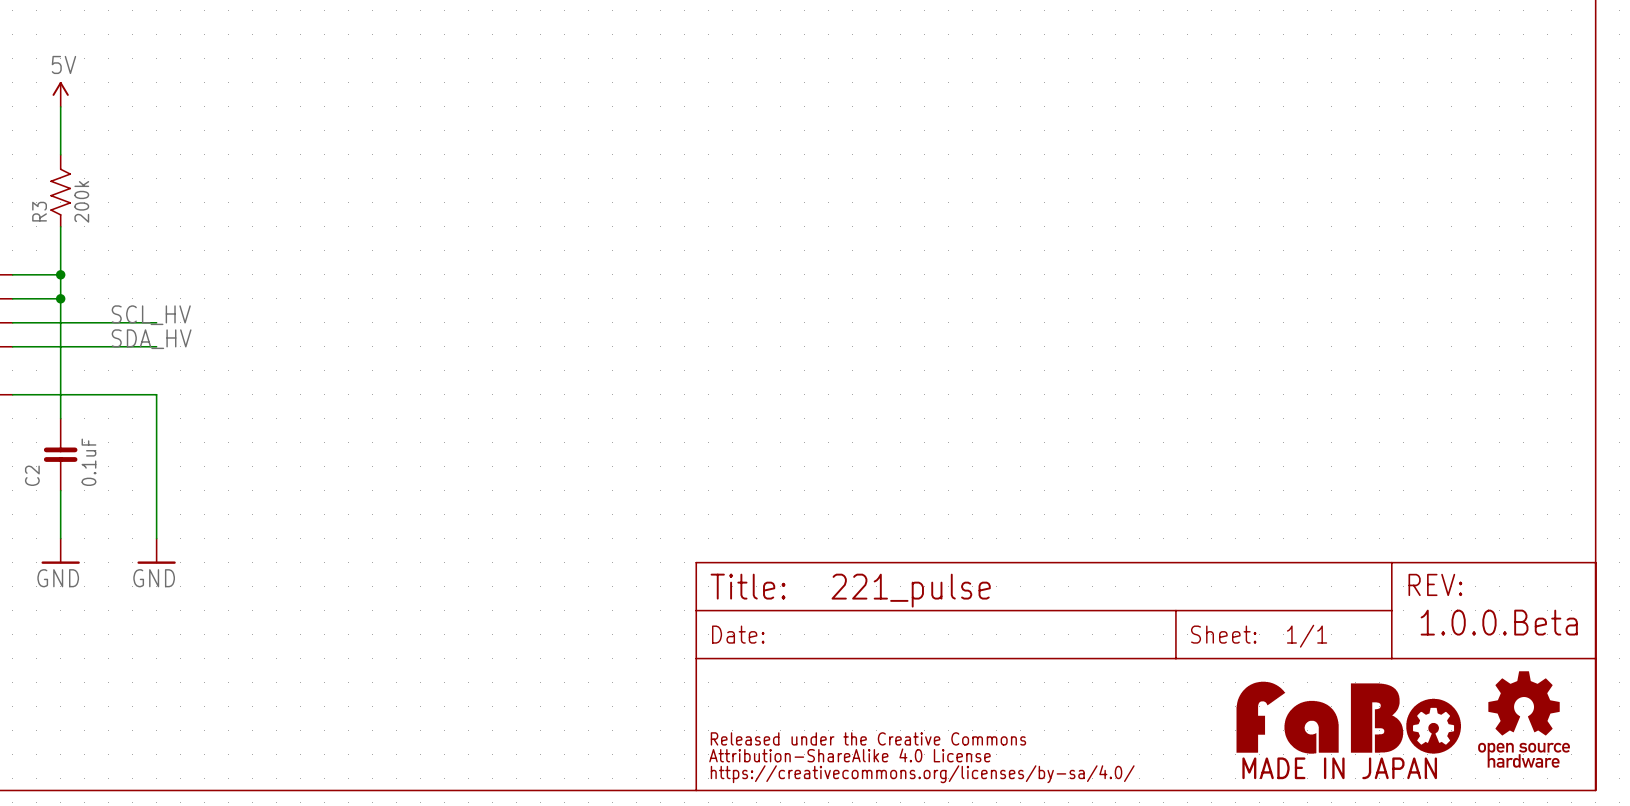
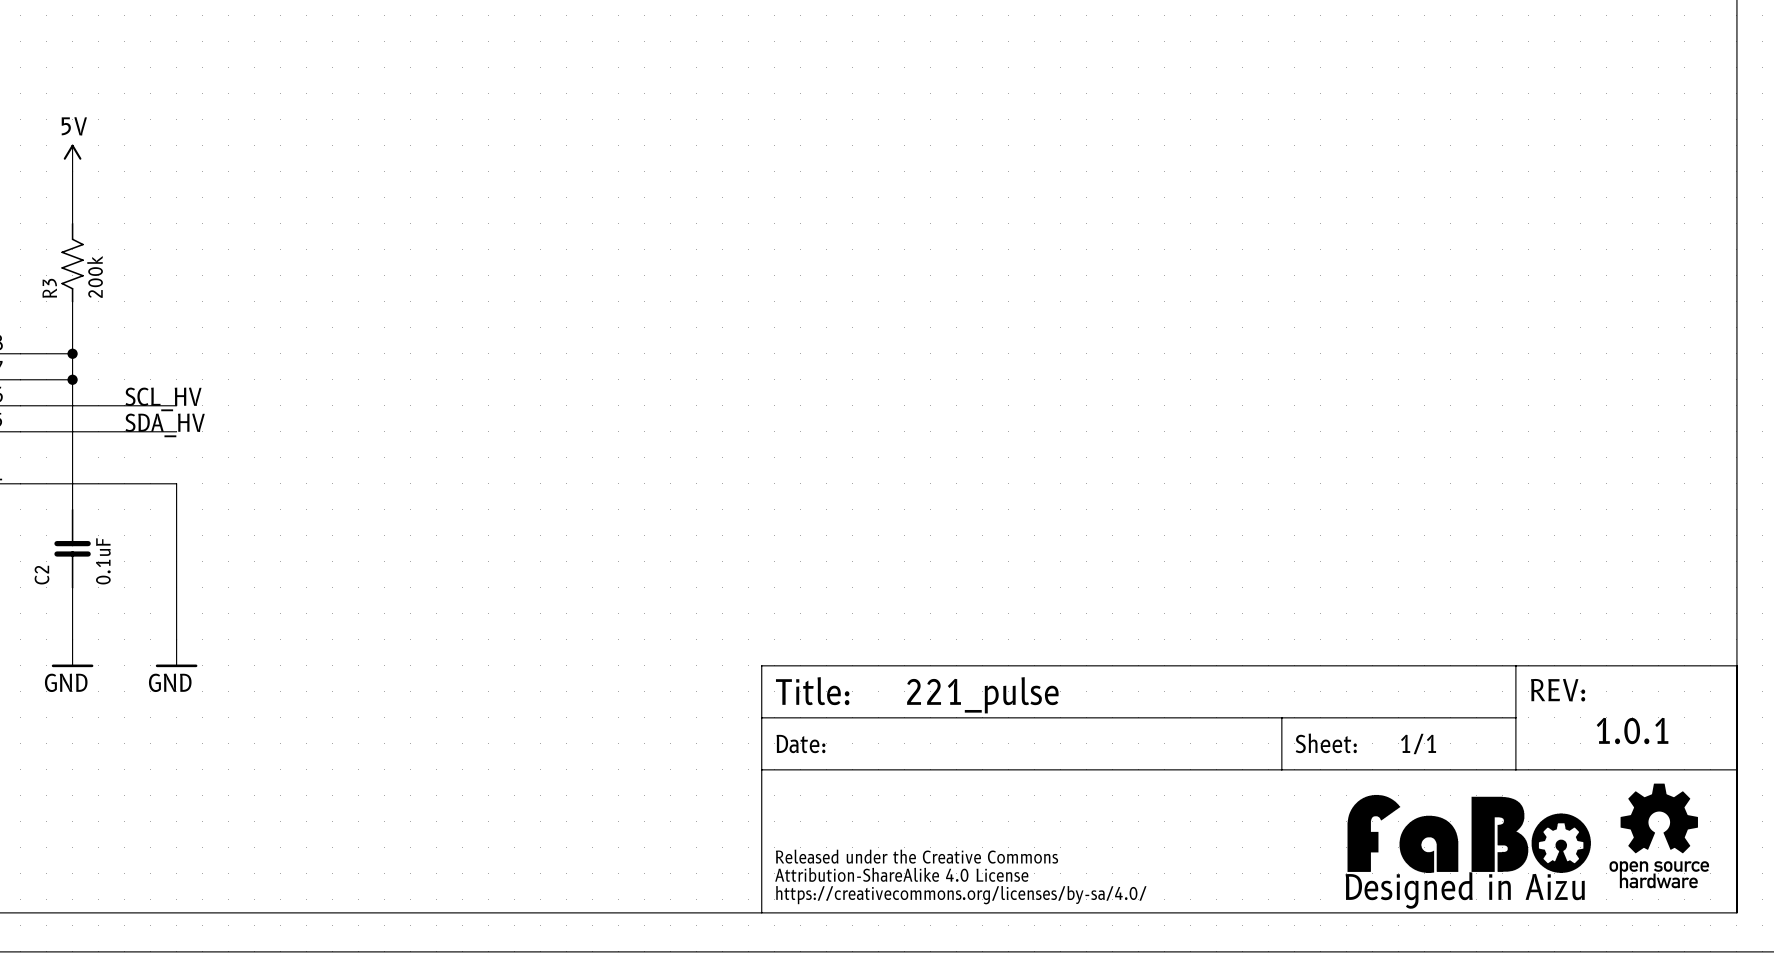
text: 1.0.0.Beta (1499, 622) -> 1.0.1 (1632, 731)
part text: MADE IN JAPAN (1339, 768) -> none
part text: none -> Designed in Aizu (1465, 890)

